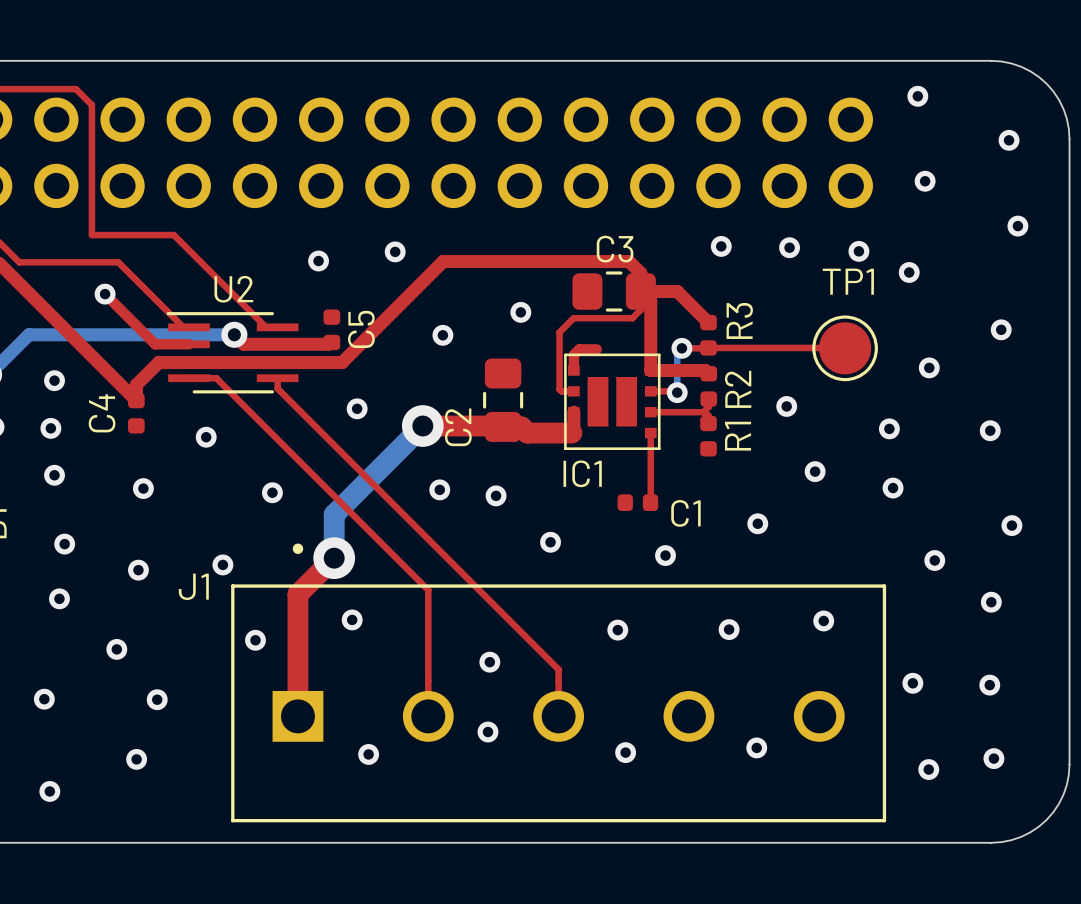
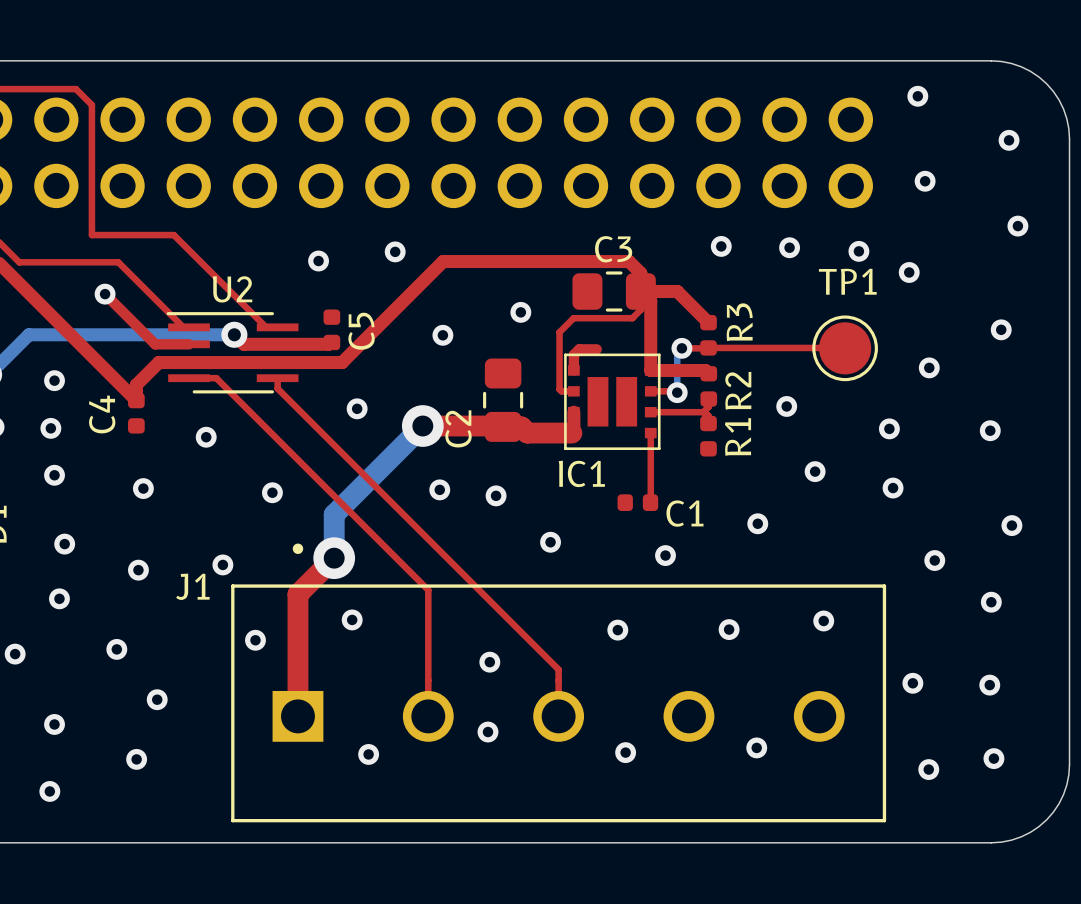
via: none -> (15, 654)
via: (44, 699) -> none
via: none -> (54, 724)

